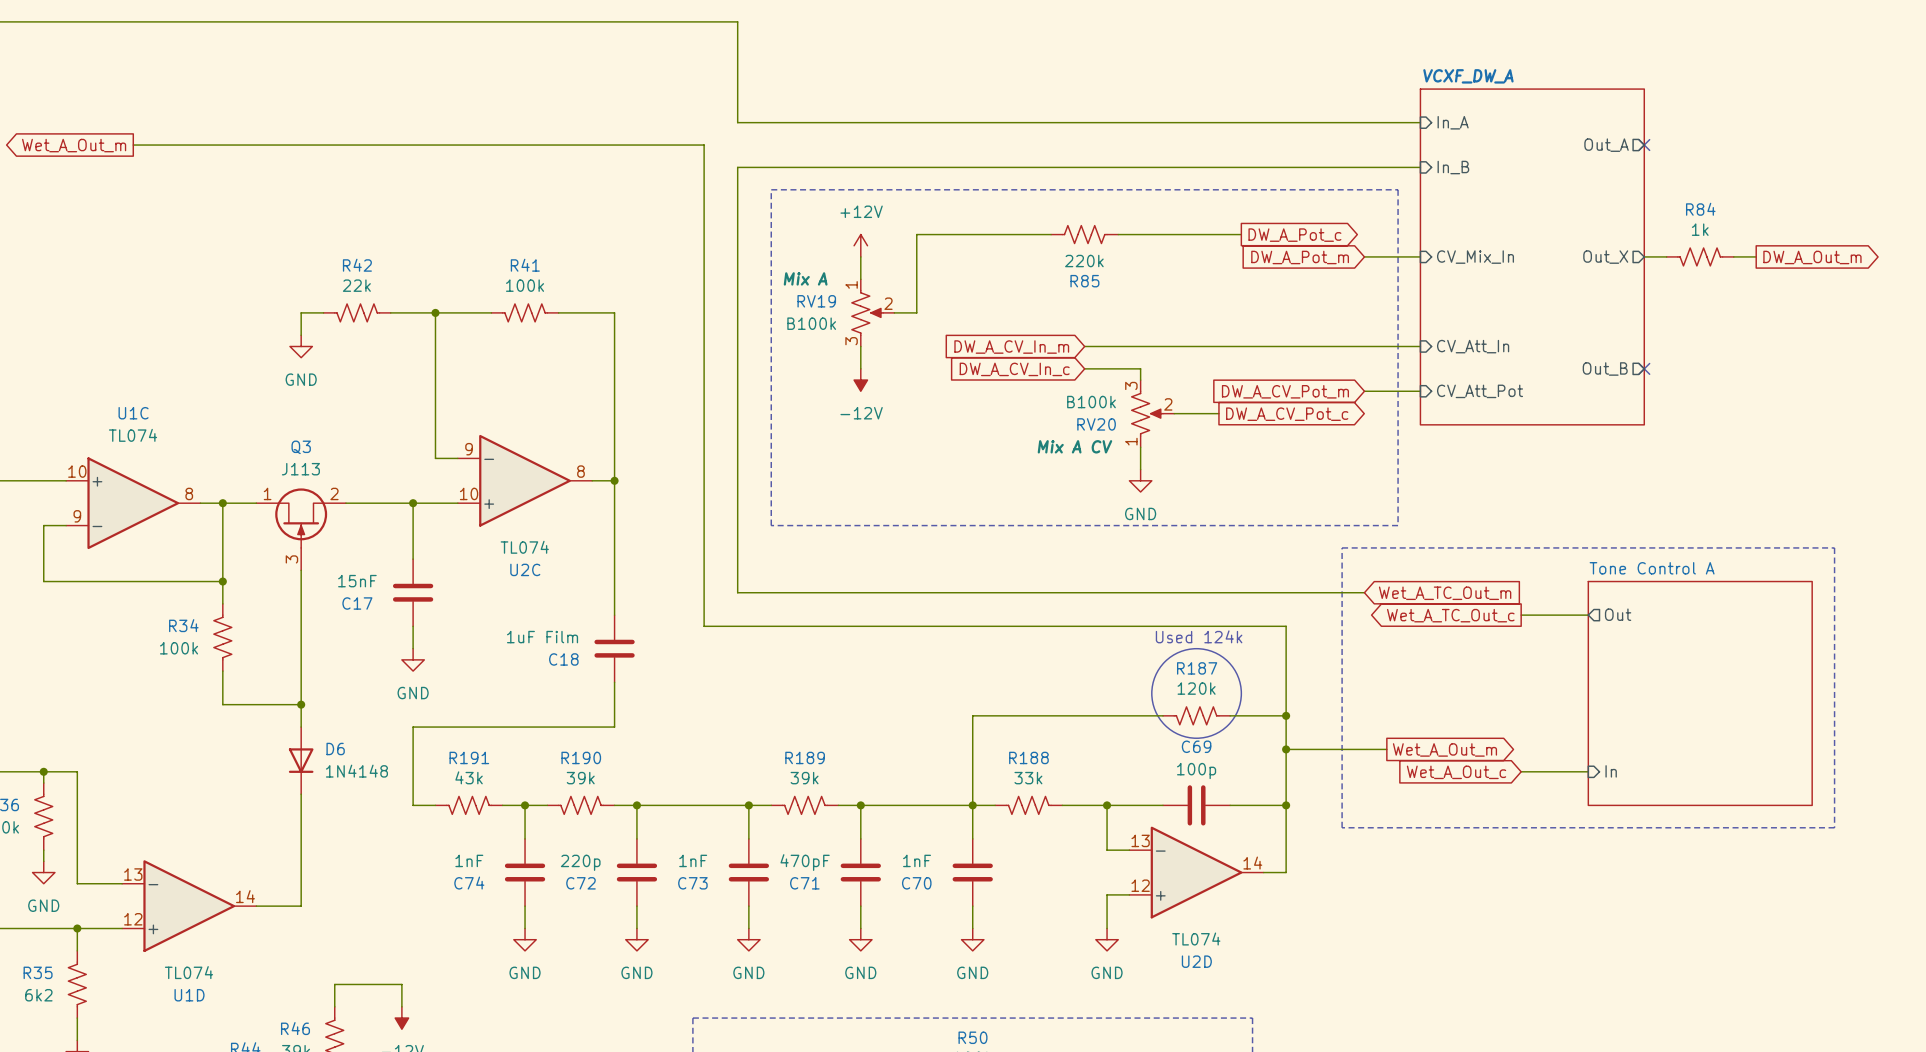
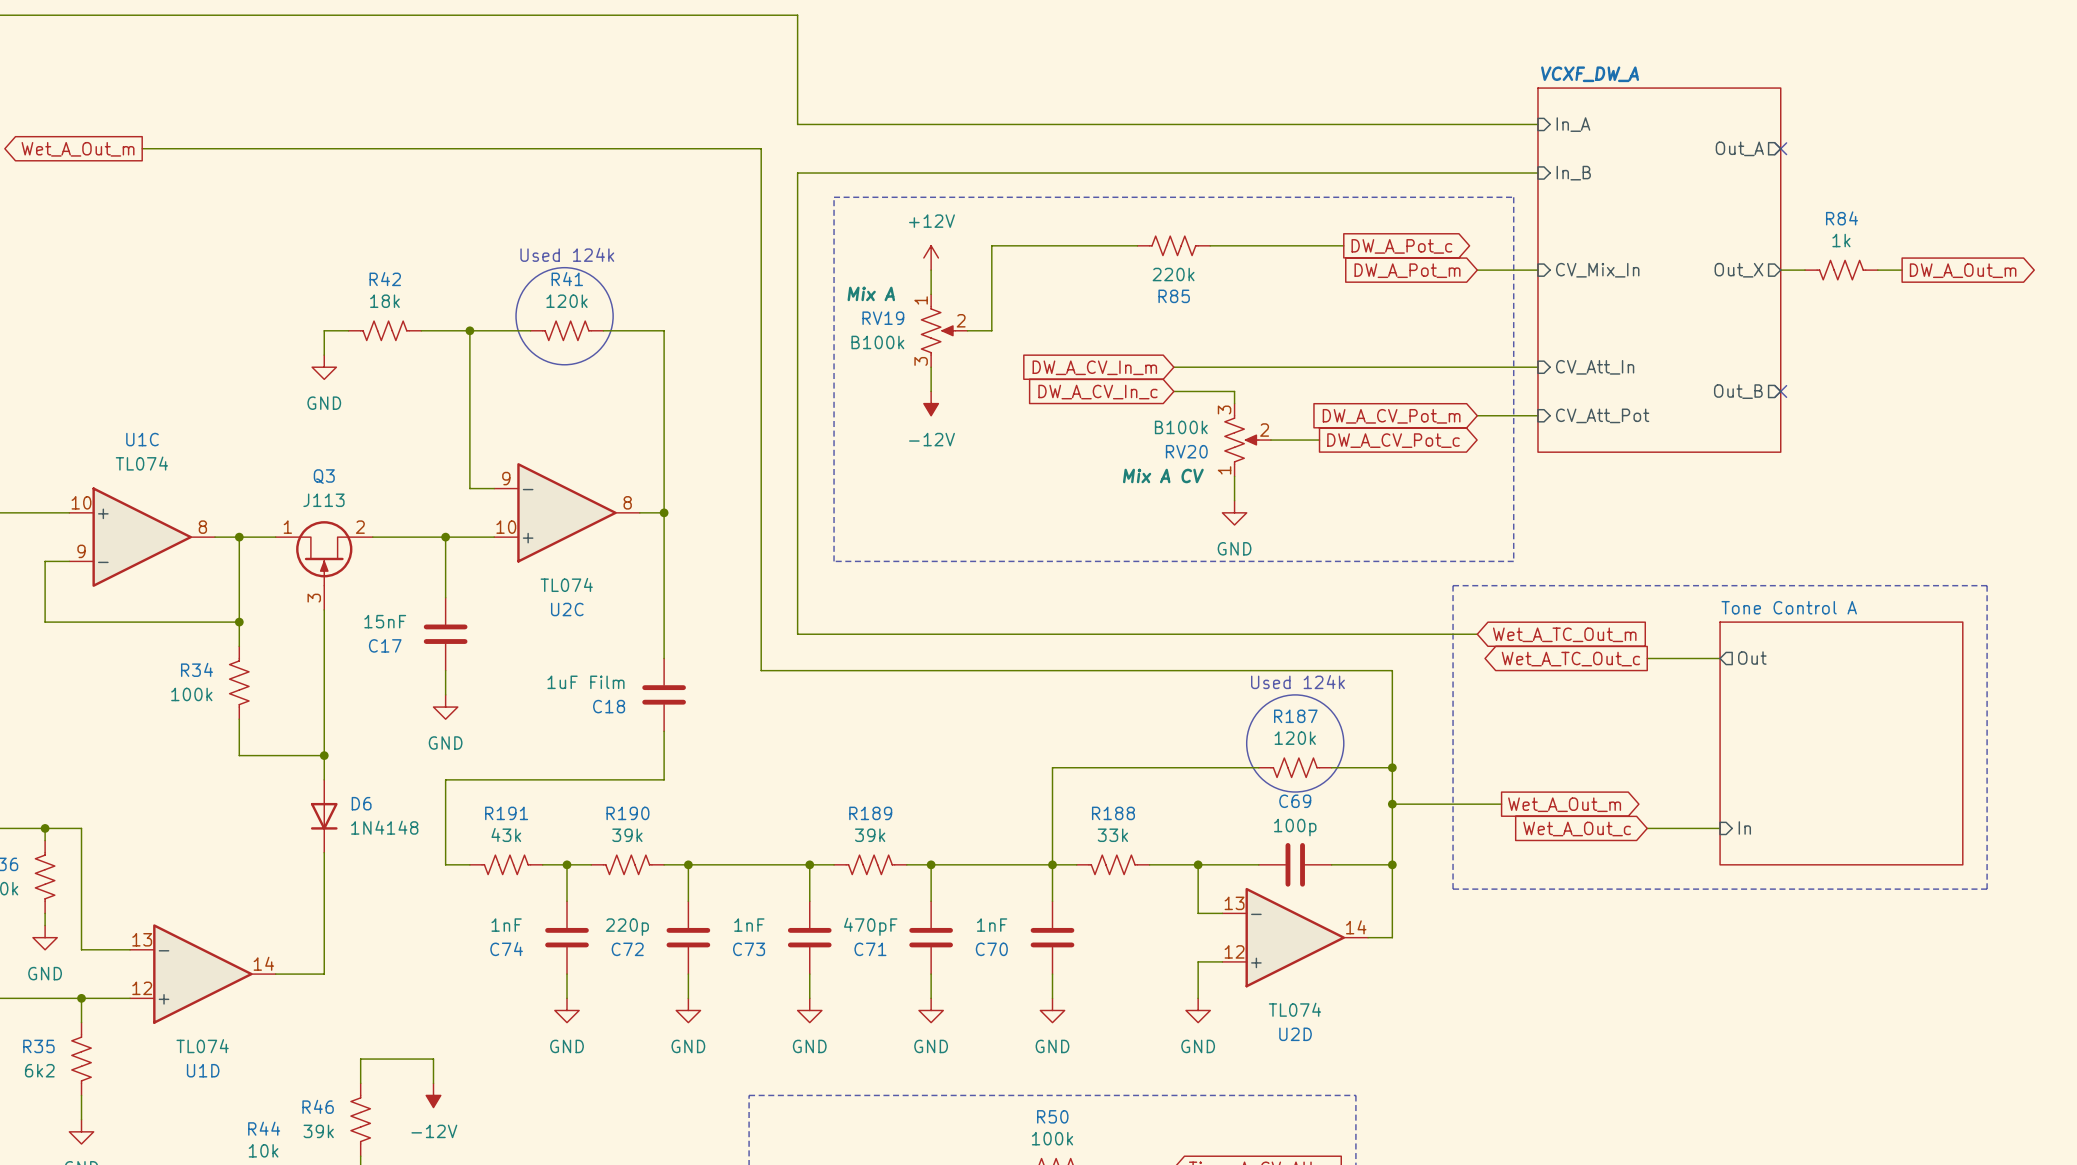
text: none -> Used 124k (567, 254)
drawing: none -> [516, 267, 614, 365]
R42 value: 22k (356, 285) -> 18k (384, 301)
R41 value: 100k (525, 285) -> 120k (567, 301)

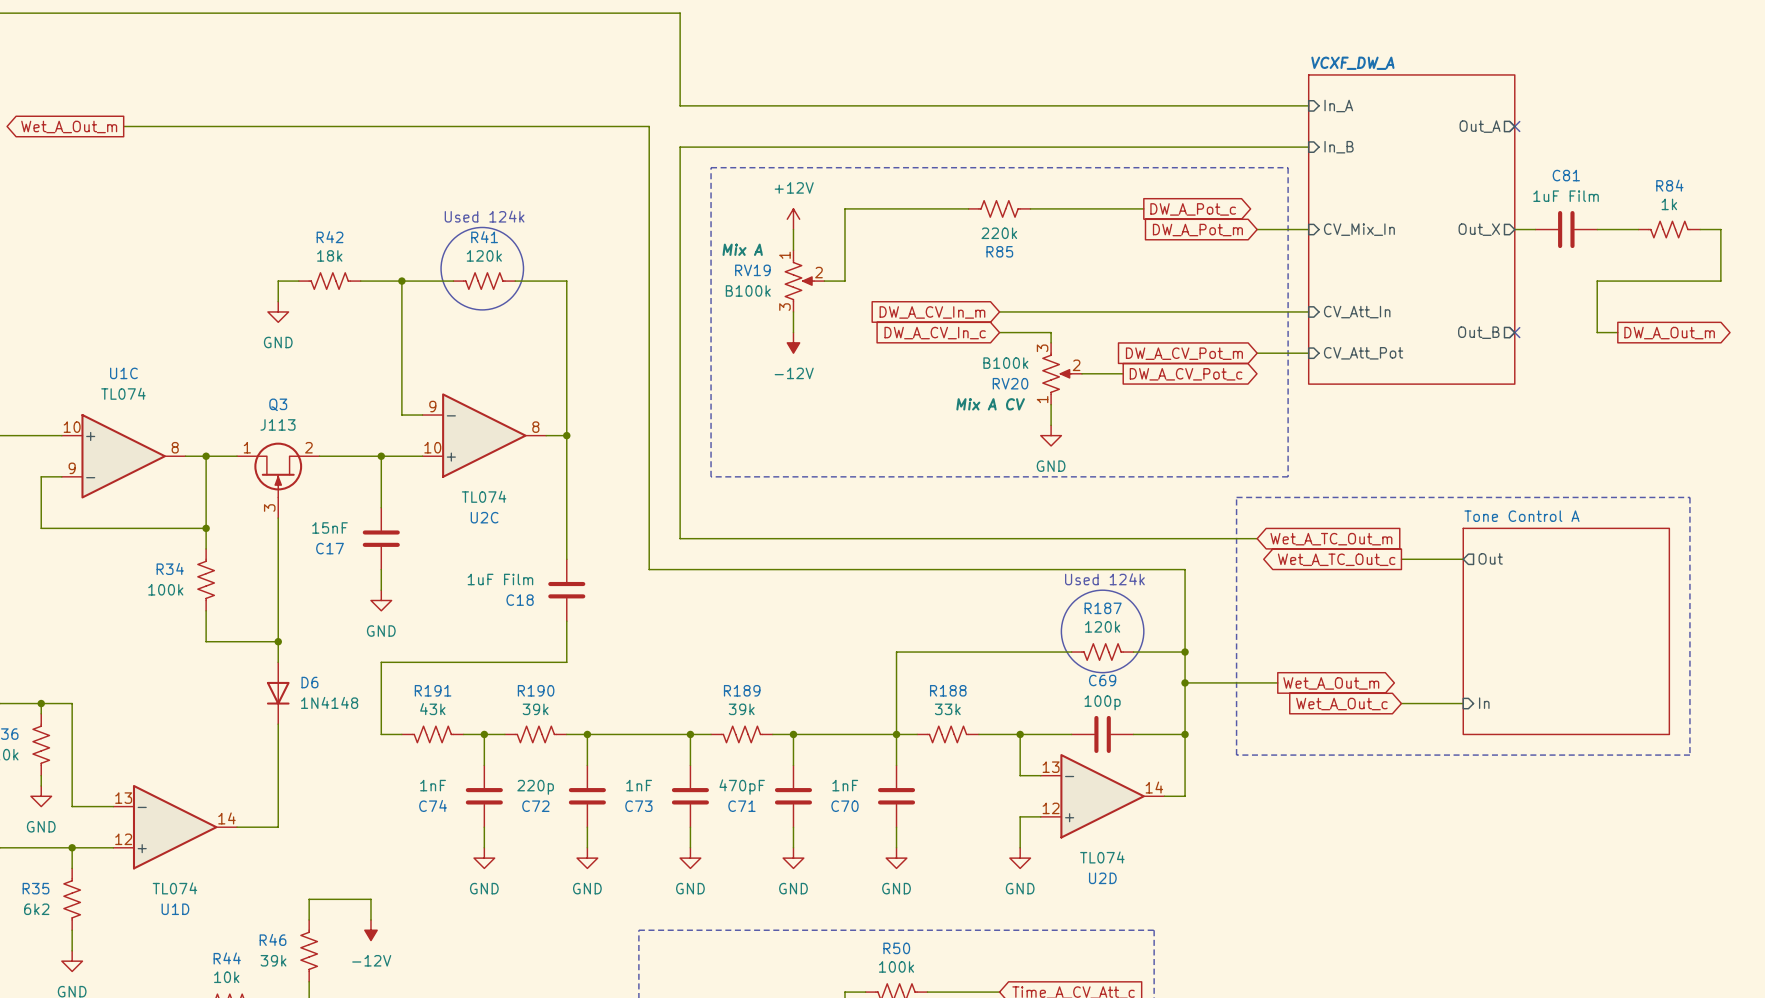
R84 position: (1841, 270) -> (1669, 229)
C81: none -> 1uF Film (1566, 229)
wire: none -> (1617, 229) (1638, 229)
global label position: DW_A_Out_m (1963, 270) -> DW_A_Out_m (1669, 333)
wire: none -> (1700, 229) (1720, 229) (1720, 281) (1597, 281) (1597, 332) (1617, 332)

